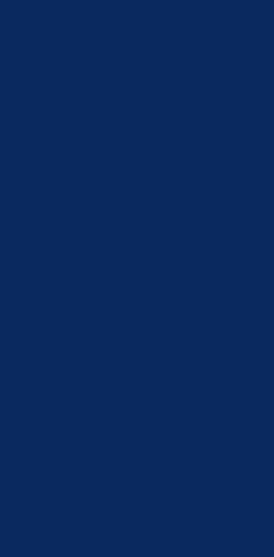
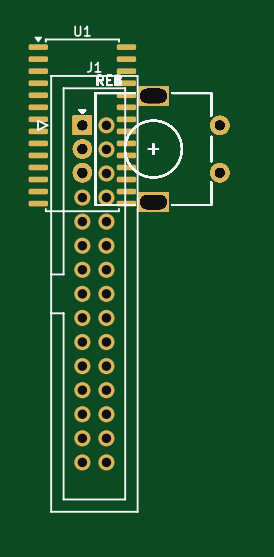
U1: none -> (82, 124)
part: none -> (151, 149)
part: none -> (151, 149)
part: none -> (151, 149)
part: none -> (151, 149)
part: none -> (151, 149)
part: none -> (151, 149)
part: none -> (151, 149)
part: none -> (151, 149)
J1: none -> (87, 293)

